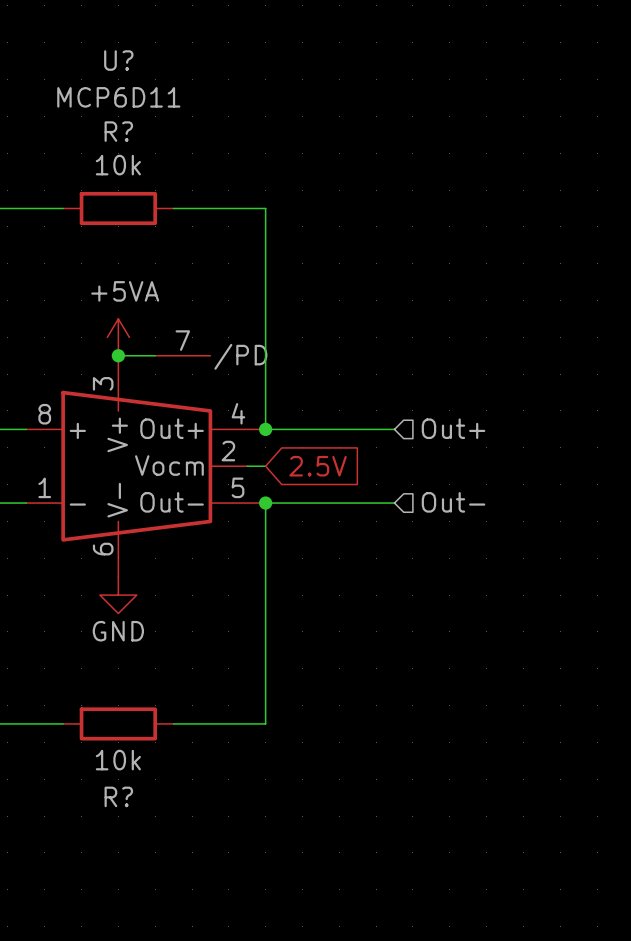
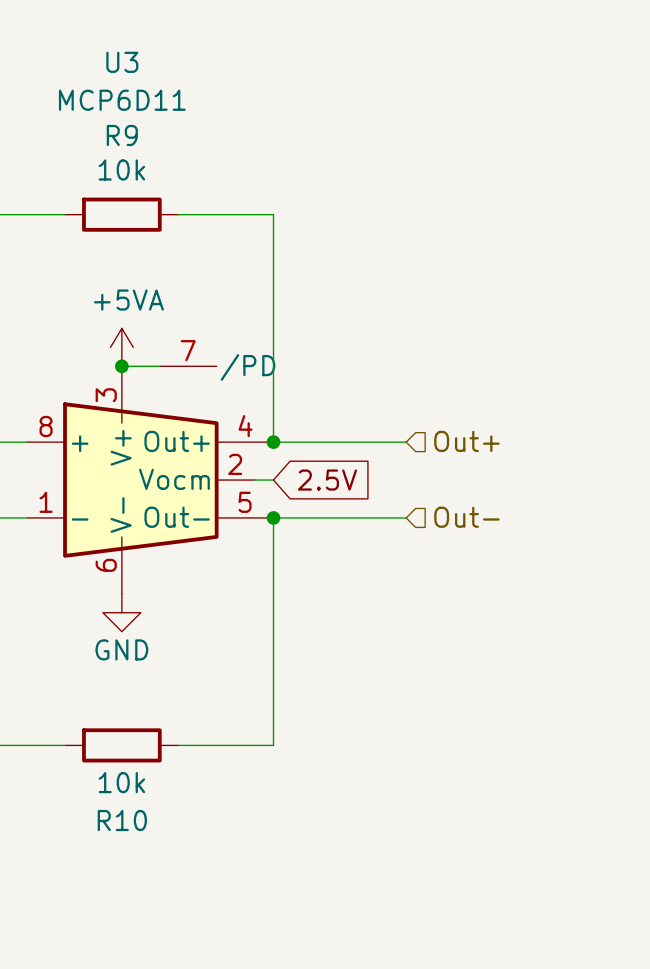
U? name: U? (118, 60) -> U3 (122, 62)
R? name: R? (118, 131) -> R9 (122, 135)
R? name: R? (118, 796) -> R10 (122, 820)

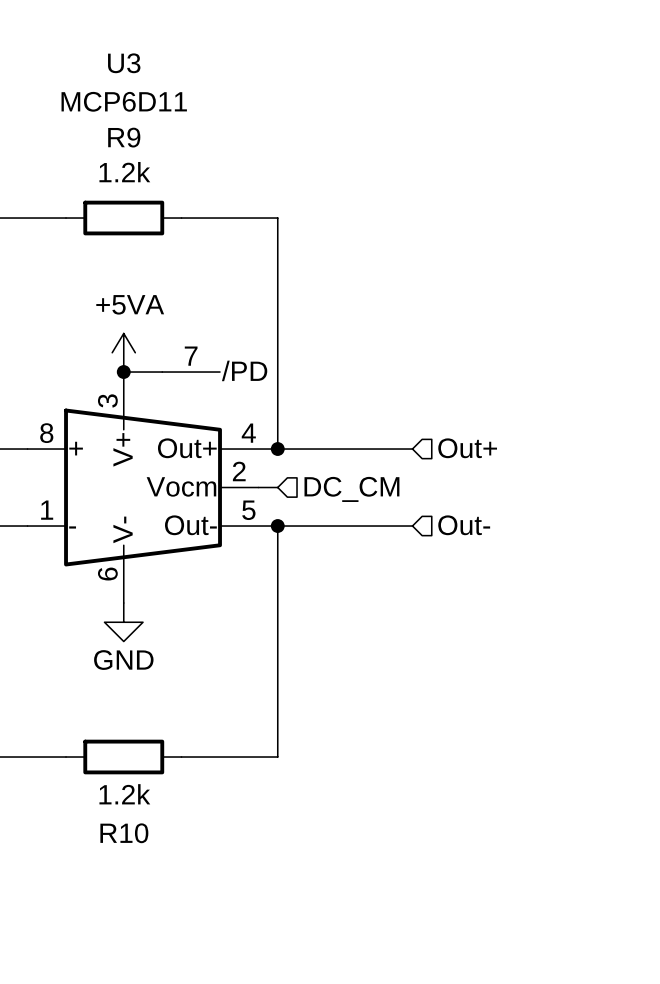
R9 value: 10k (121, 169) -> 1.2k (124, 172)
global label: 2.5V (327, 480) -> none
hierarchical label: none -> DC_CM (351, 489)
R10 value: 10k (121, 782) -> 1.2k (124, 794)

